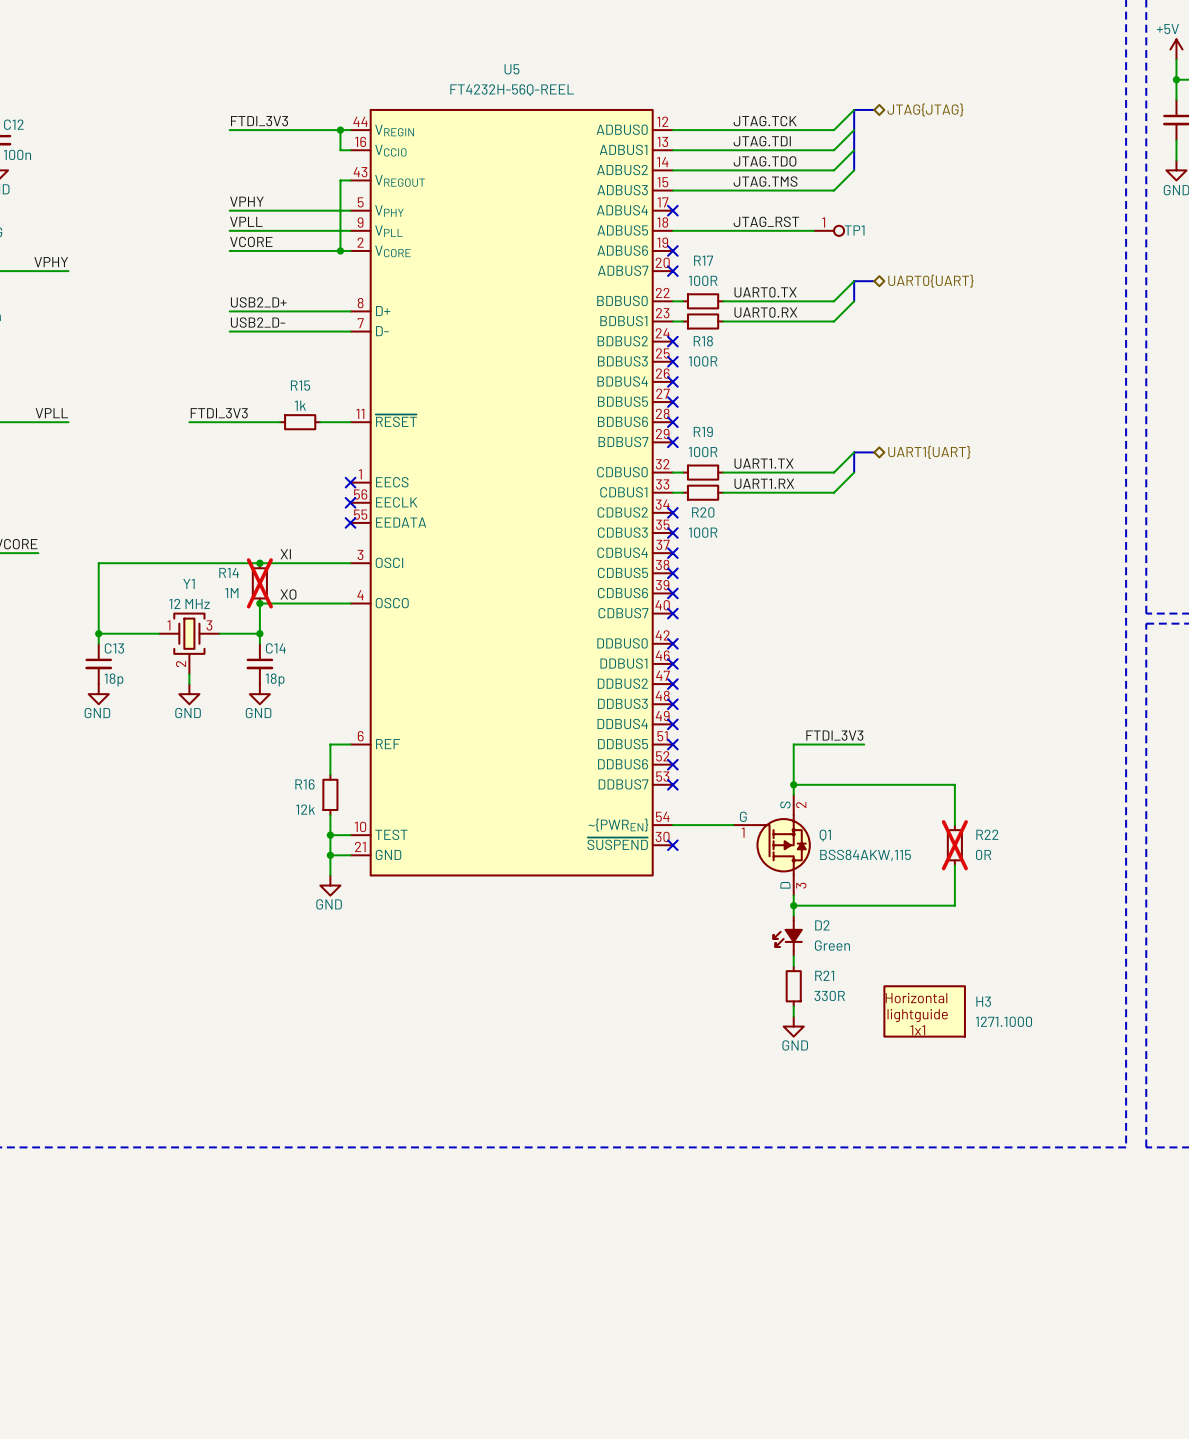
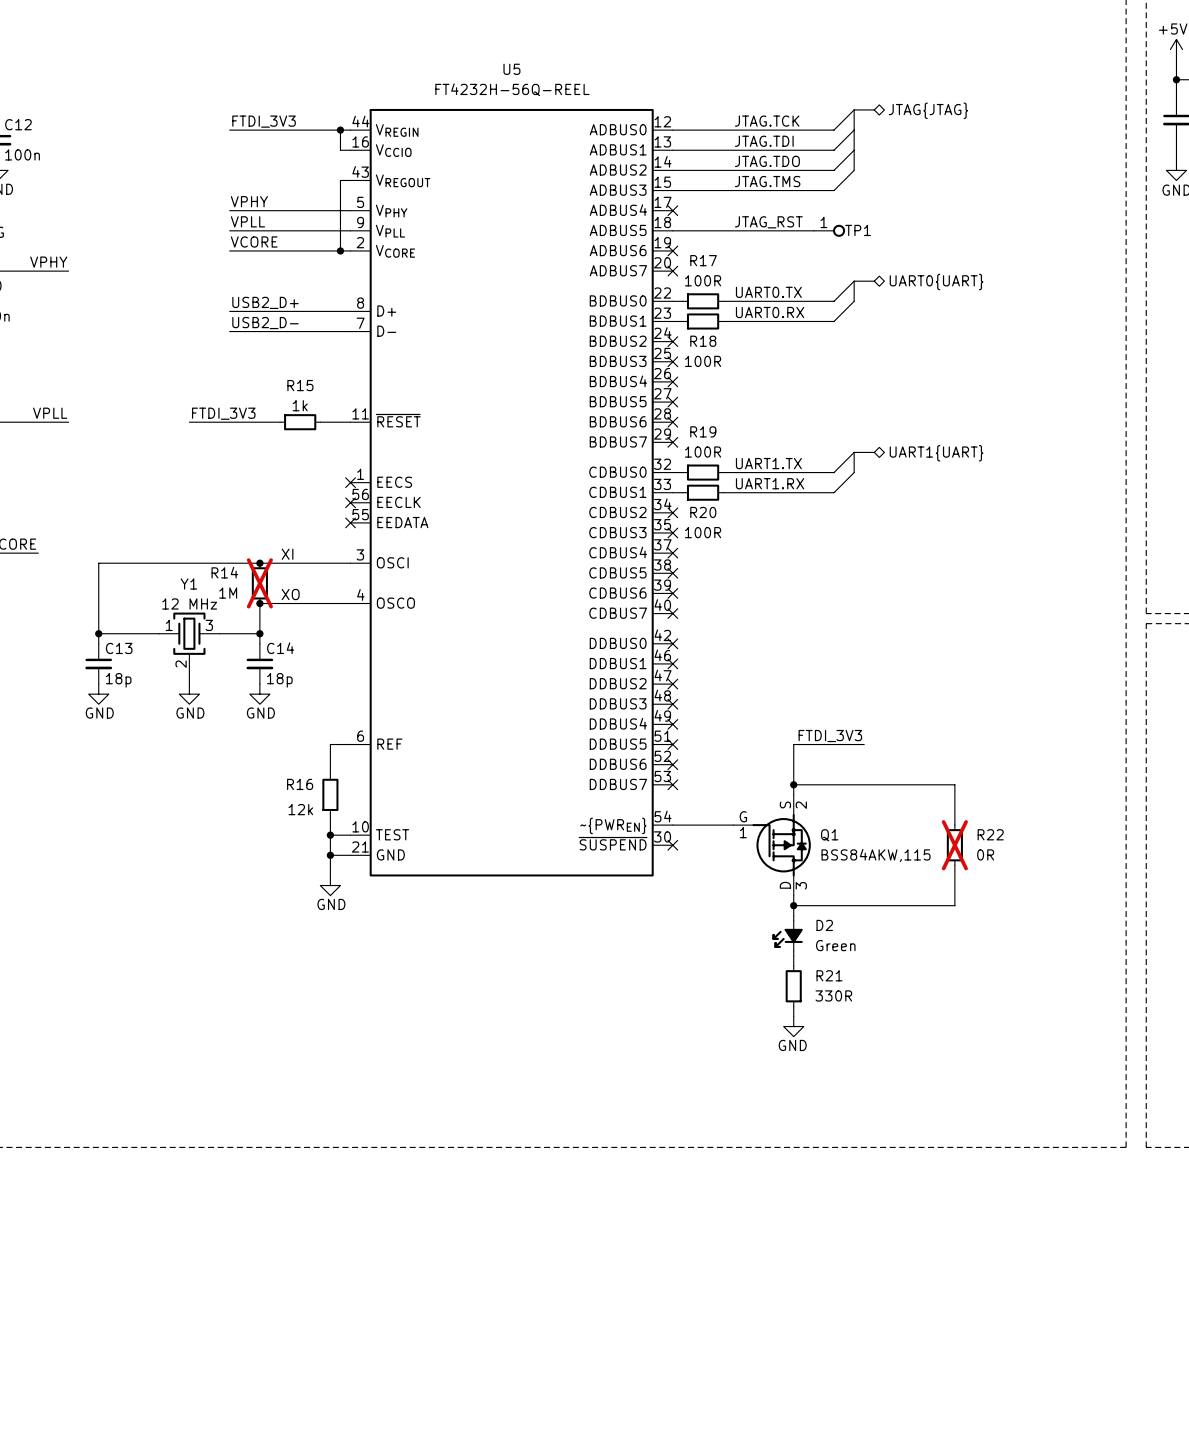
H3: (924, 1011) -> none

